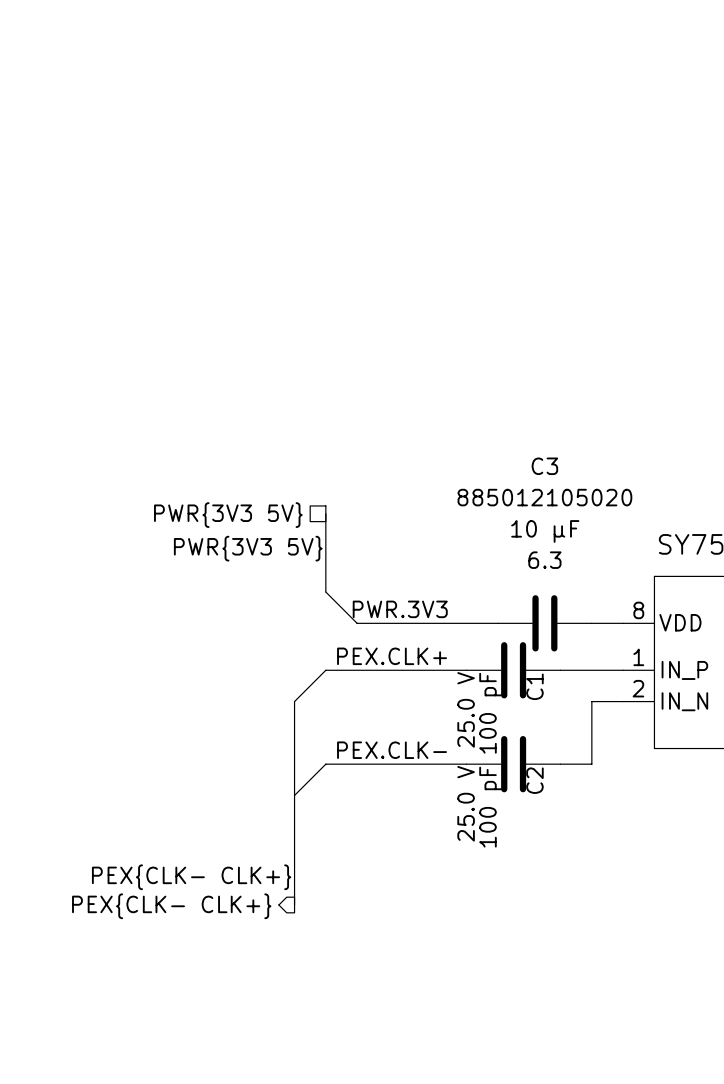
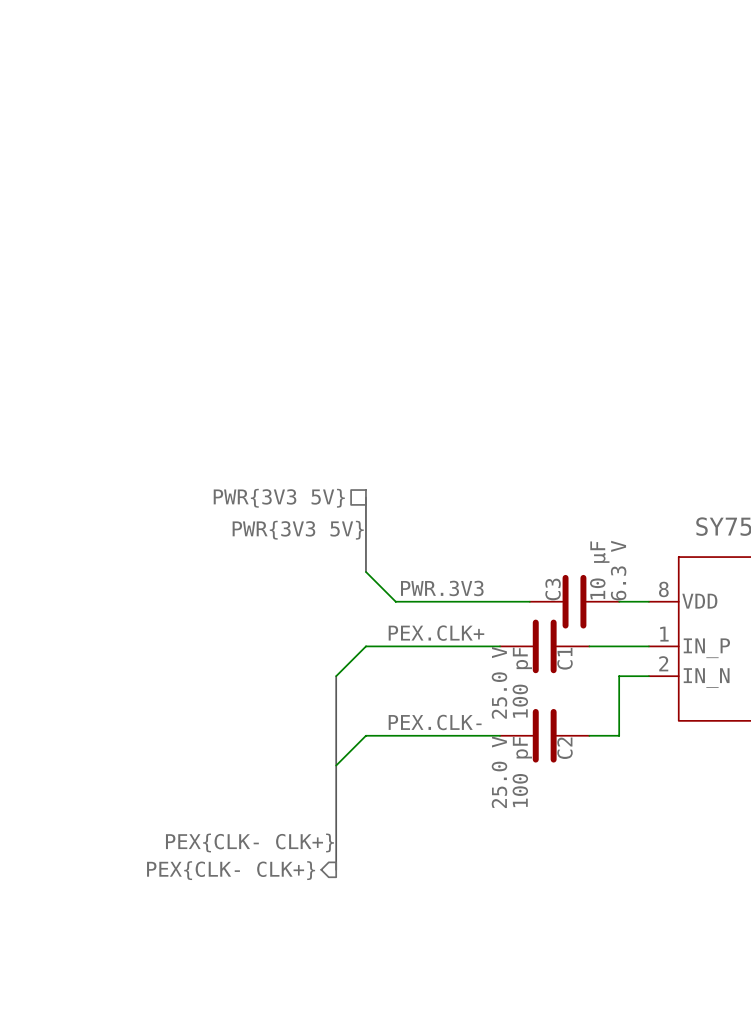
C3 name rotation: 0° (544, 466) -> 90° counterclockwise (553, 589)
C3 name position: C3 (544, 466) -> C3 (553, 589)
C3 text: 885012105020 (544, 497) -> none
C3 text rotation: 0° (545, 531) -> 90° counterclockwise (599, 570)
C3 text: 6.3 (544, 560) -> 6.3 V (618, 570)

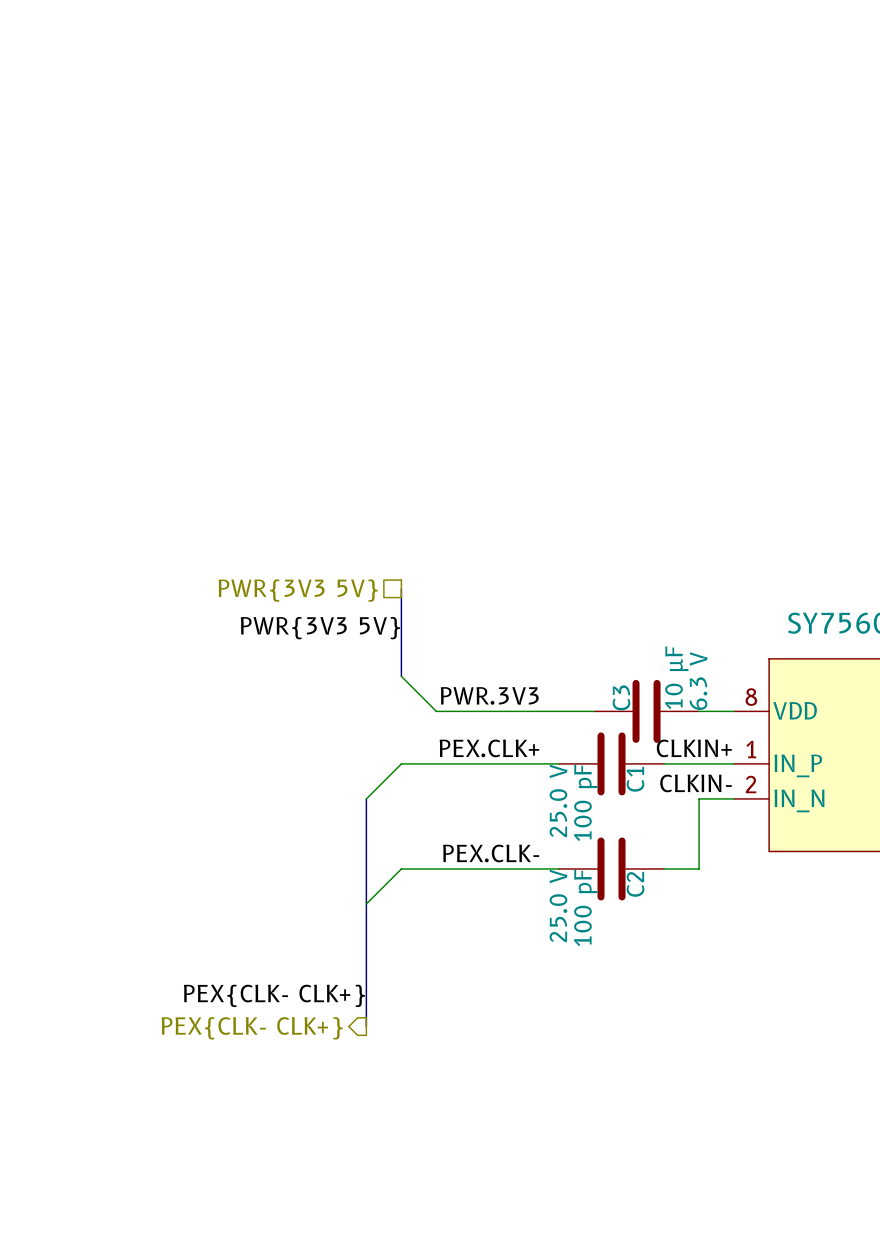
label: none -> CLKIN+ (694, 748)
label: none -> CLKIN- (696, 783)

